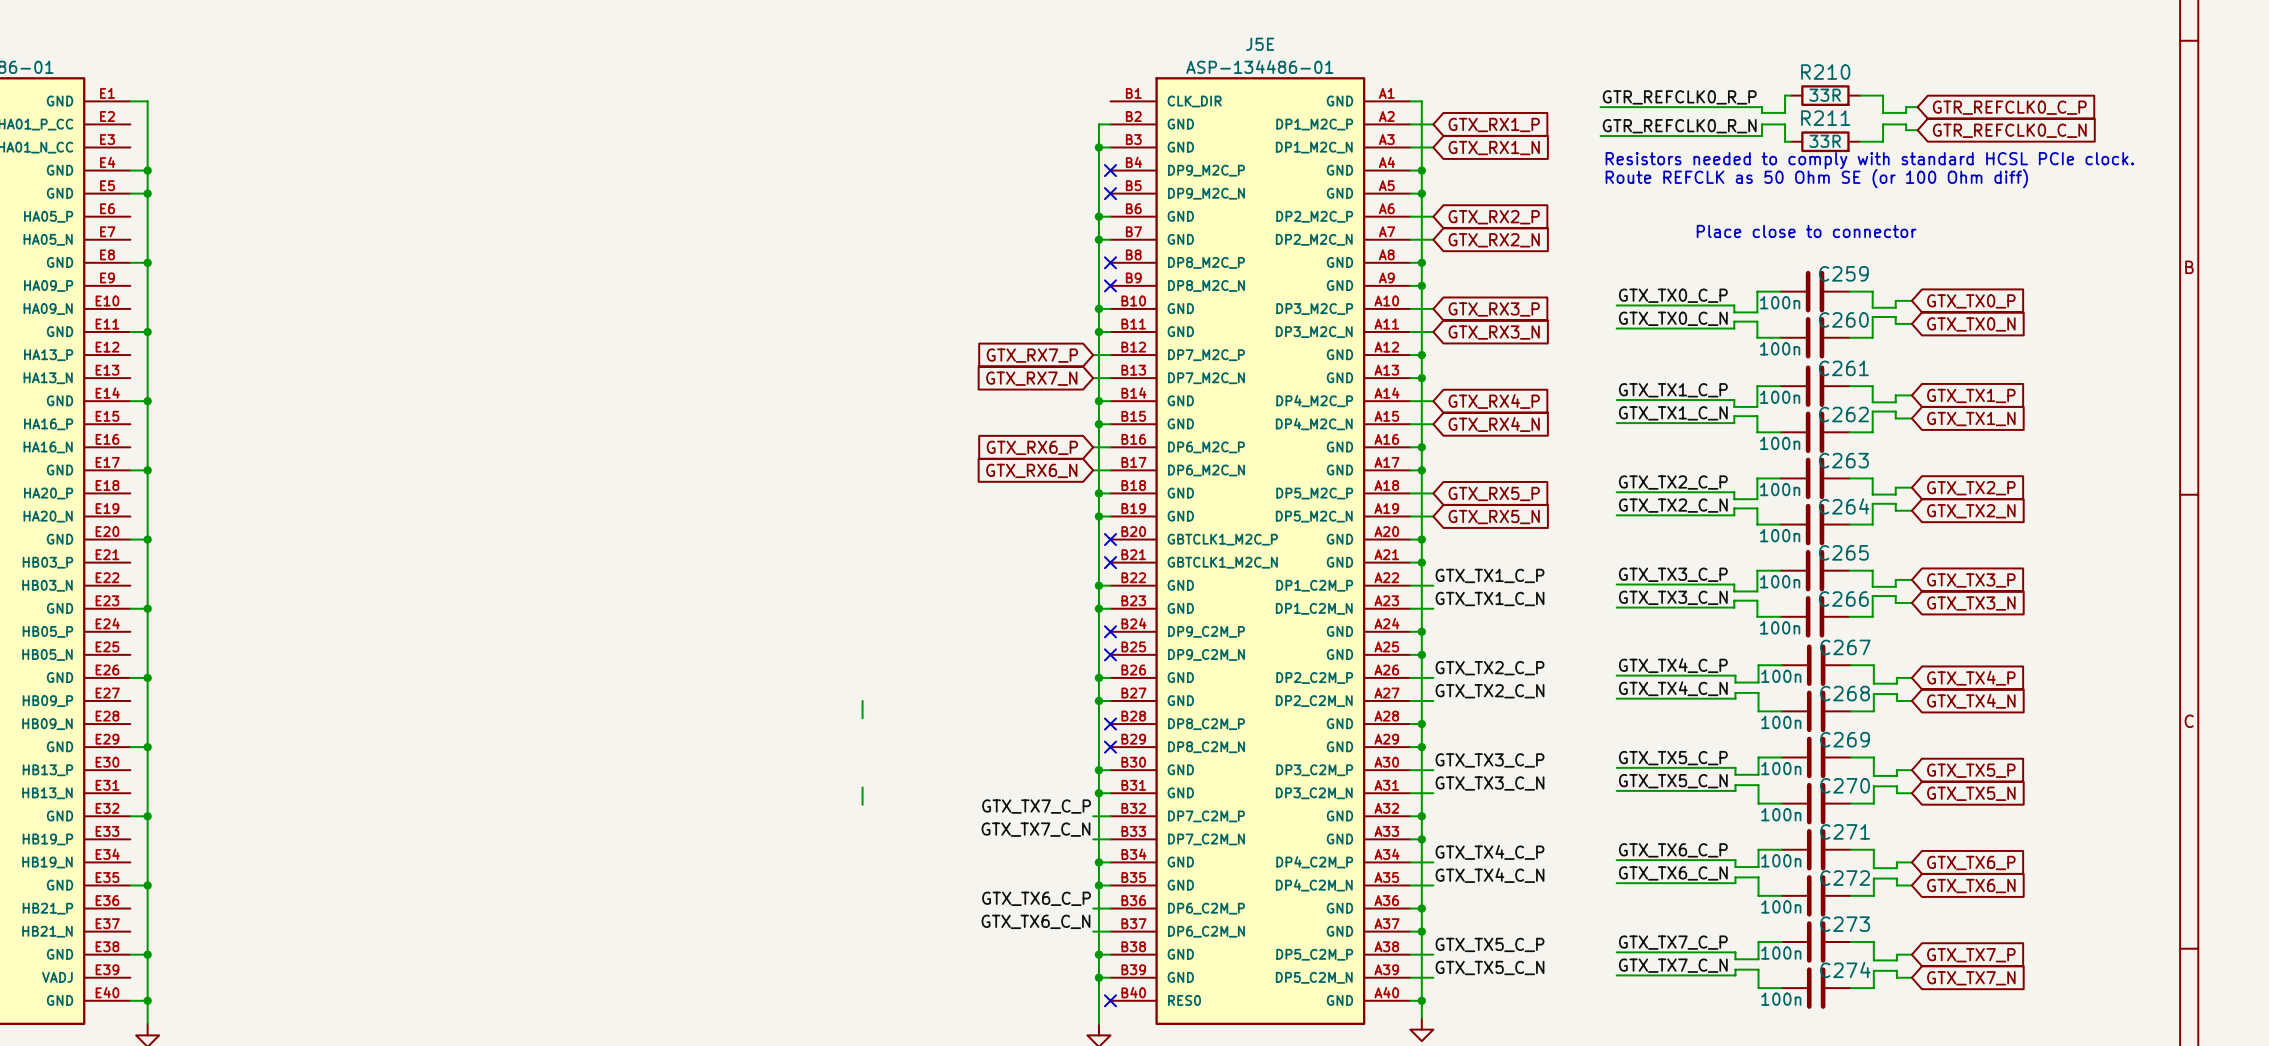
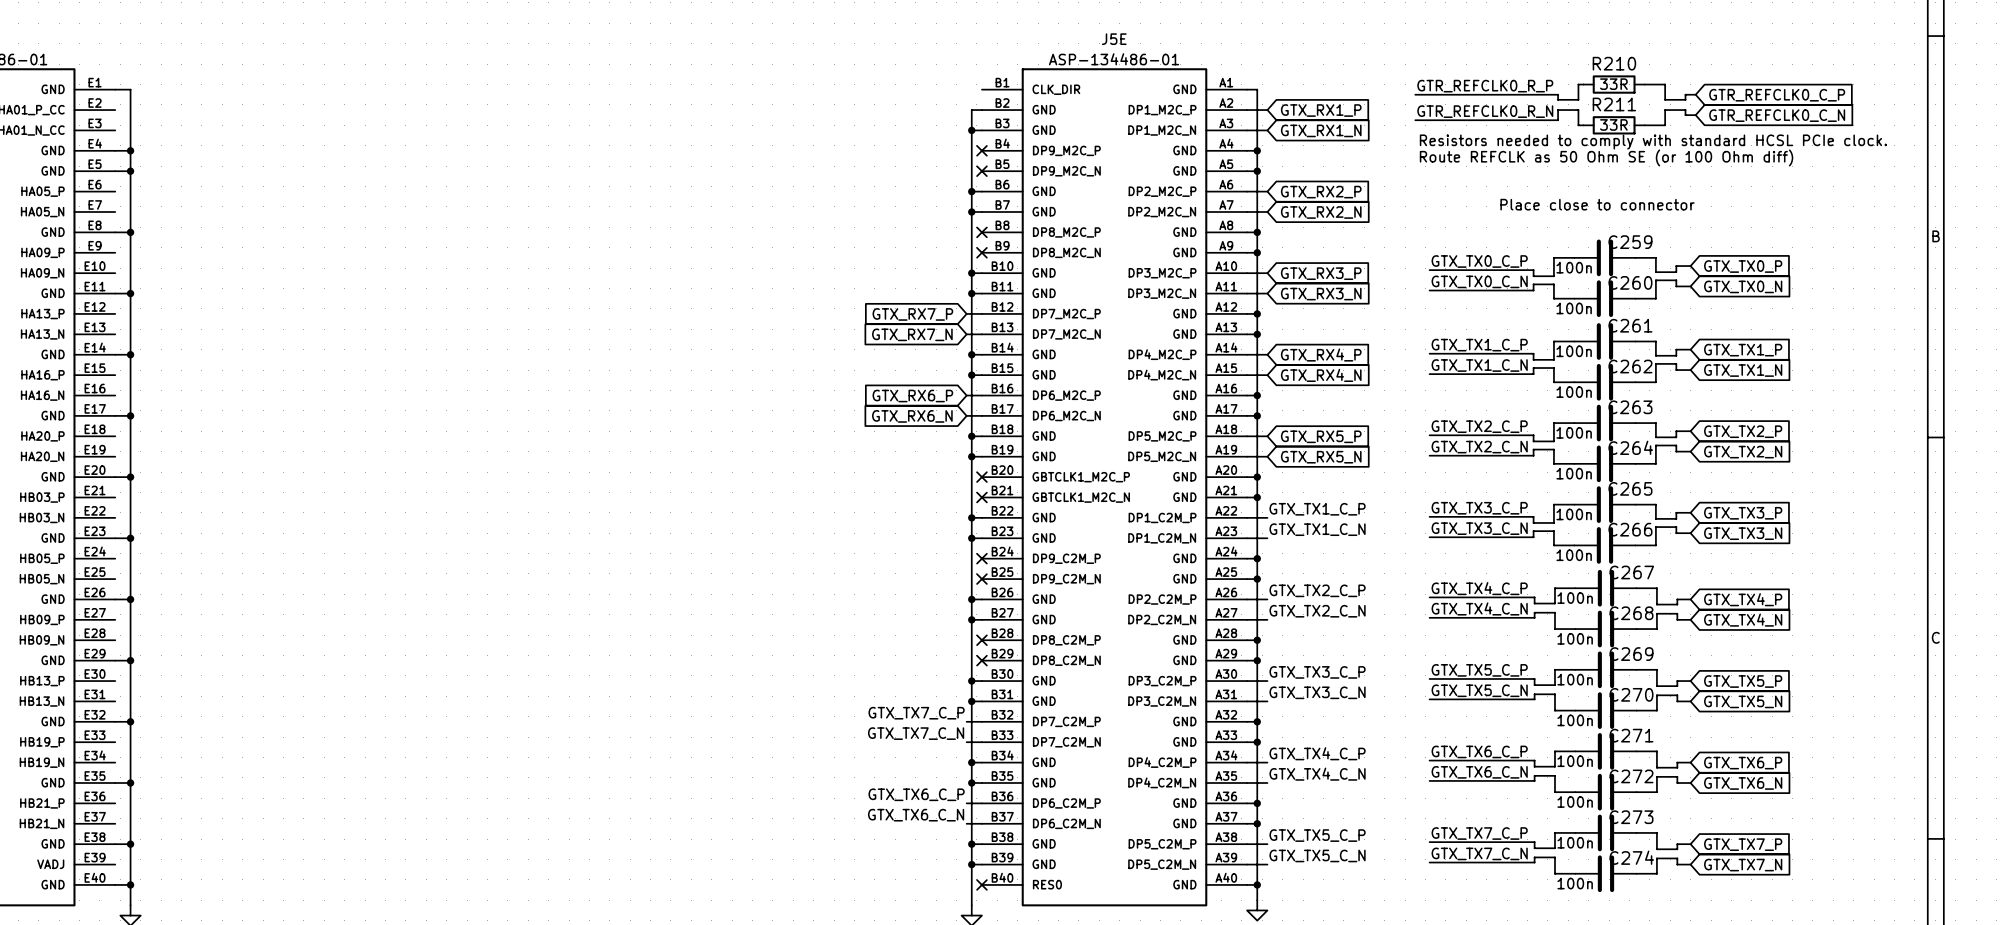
wire: (862, 700) (862, 718) -> none
wire: (862, 787) (862, 804) -> none

